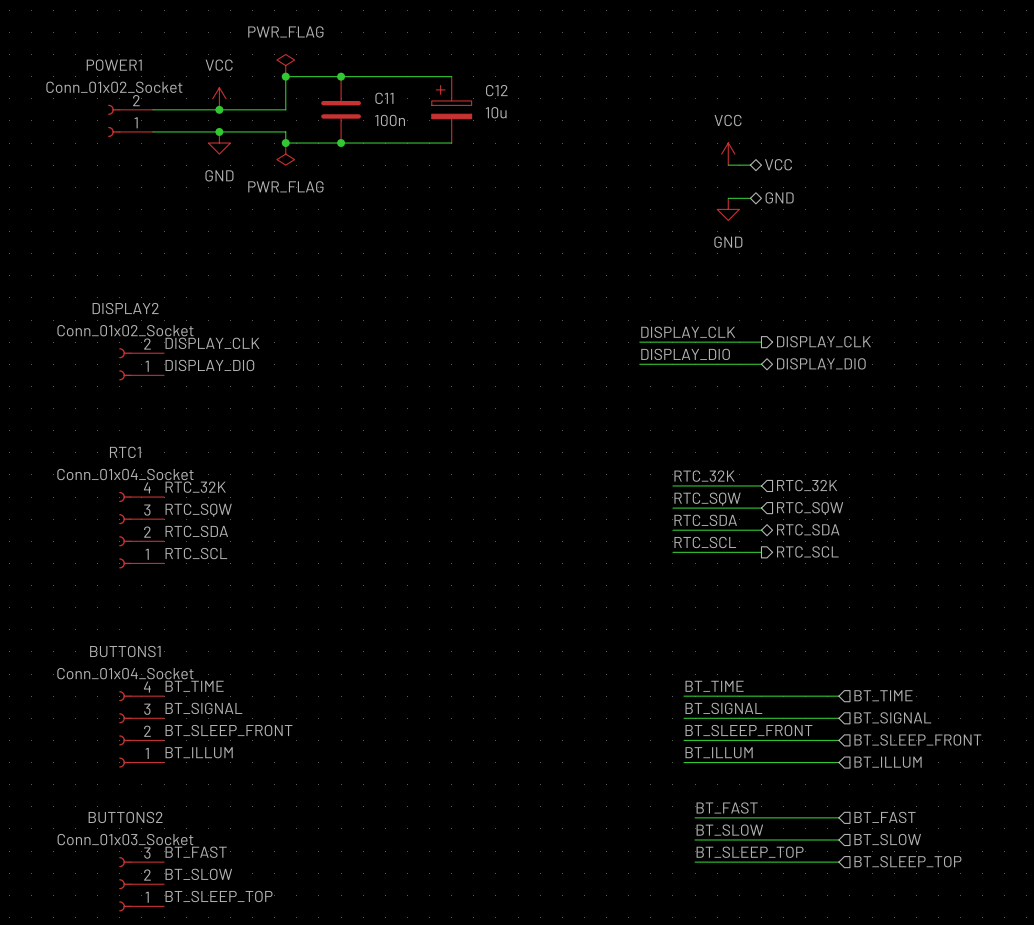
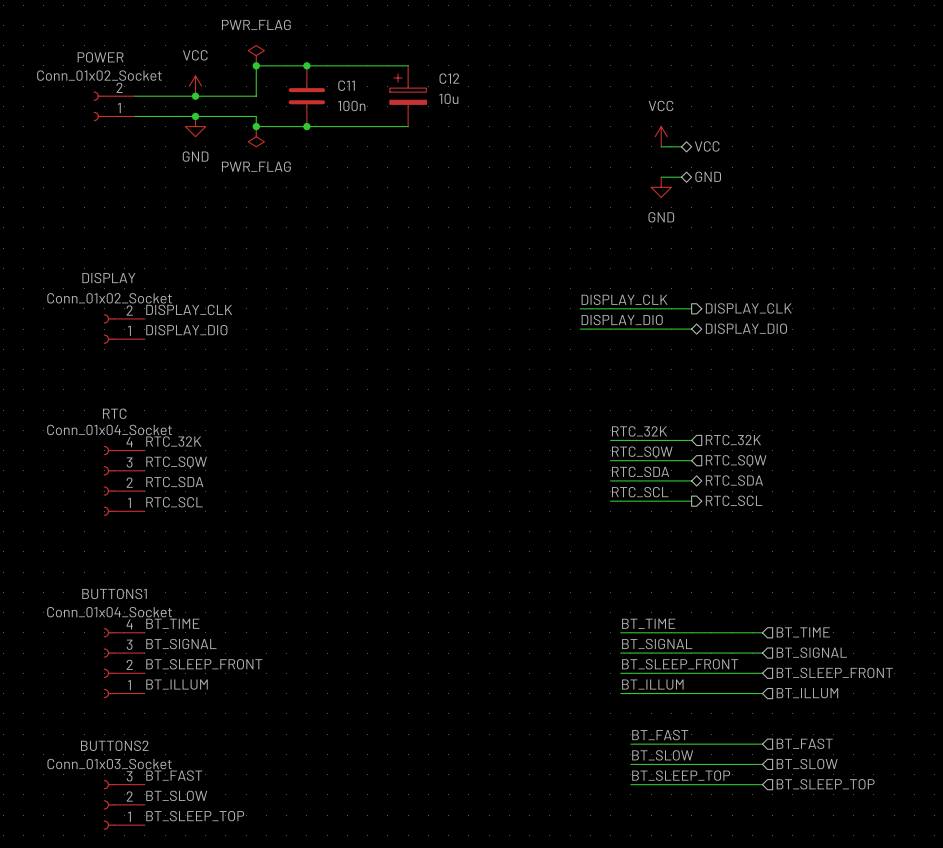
POWER1 name: POWER1 (114, 65) -> none
POWER1 text: none -> POWER (100, 57)
DISPLAY2 text: none -> DISPLAY (108, 278)
DISPLAY2 name: DISPLAY2 (125, 308) -> none
RTC1 name: RTC1 (125, 452) -> none
RTC1 text: none -> RTC (114, 413)
BUTTONS1 name: BUTTONS1 (125, 651) -> none
BUTTONS1 text: none -> BUTTONS1 (114, 593)
BUTTONS2 name: BUTTONS2 (125, 817) -> none
BUTTONS2 text: none -> BUTTONS2 (114, 745)

